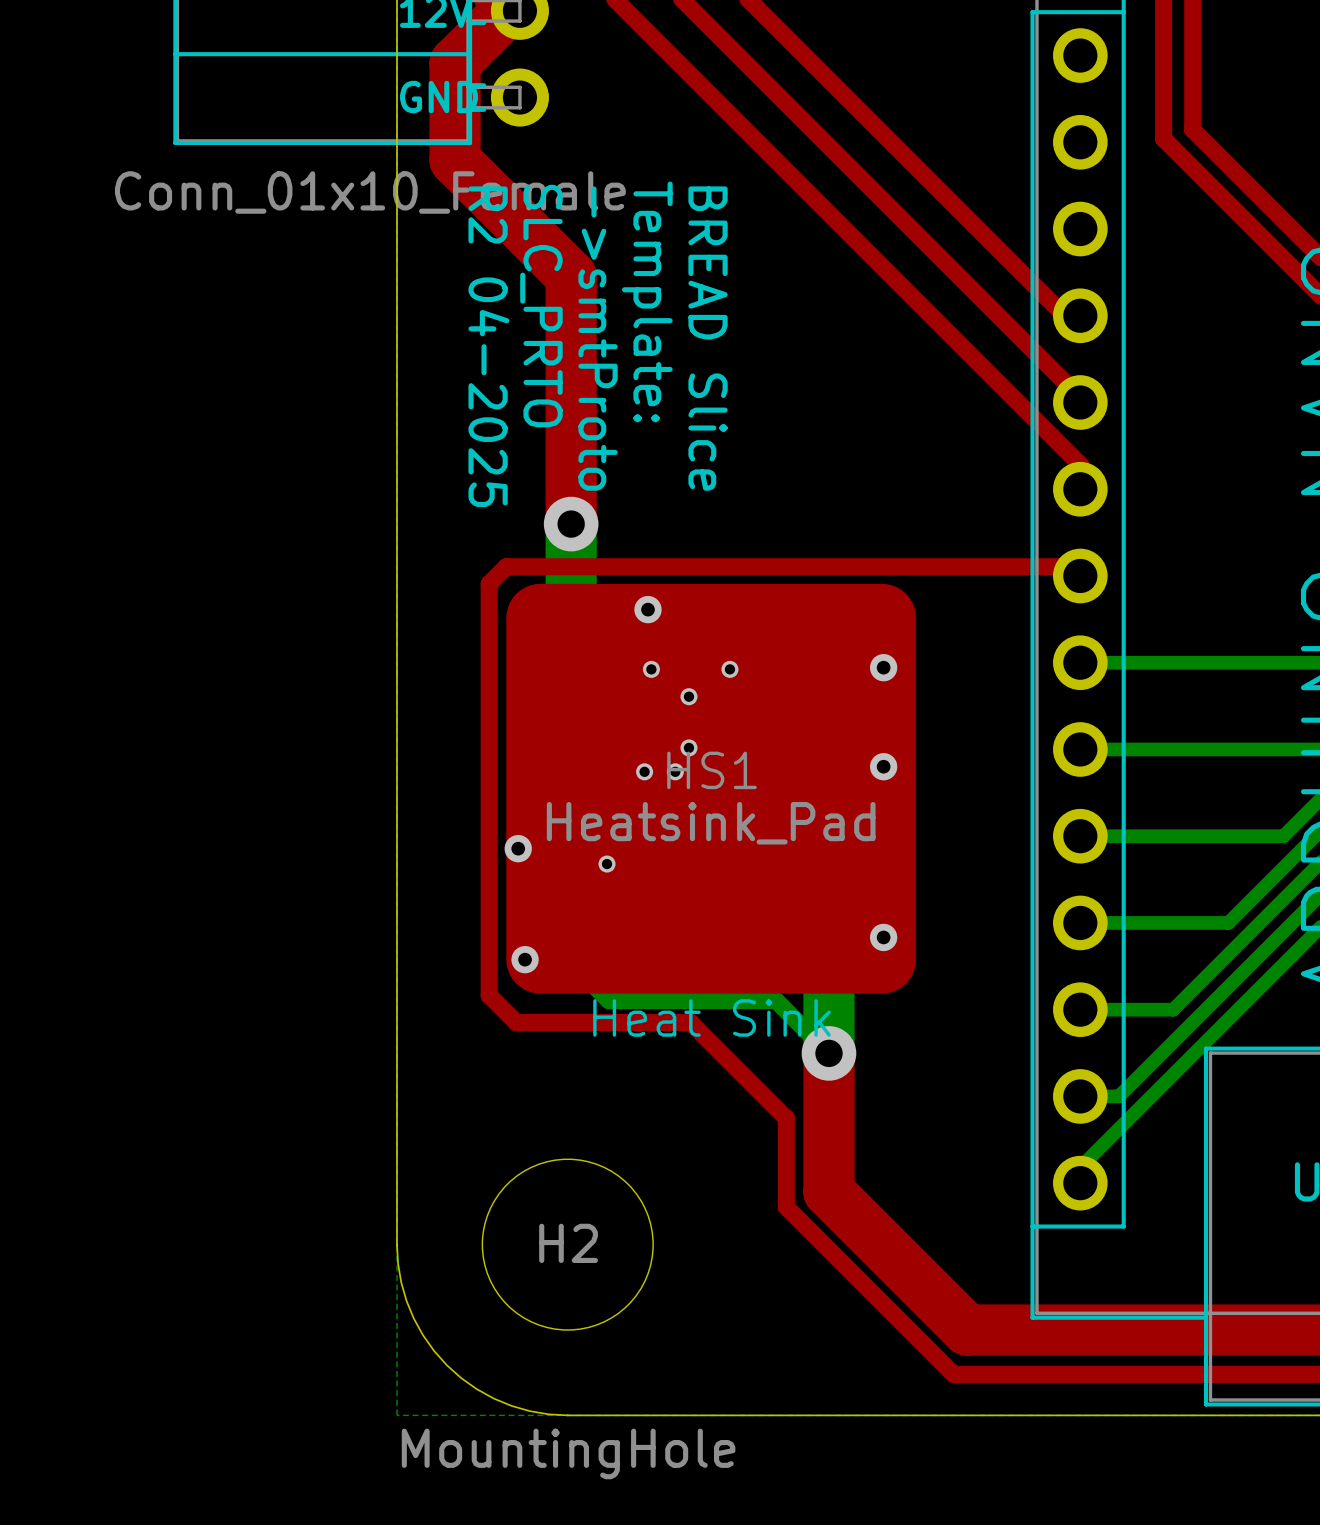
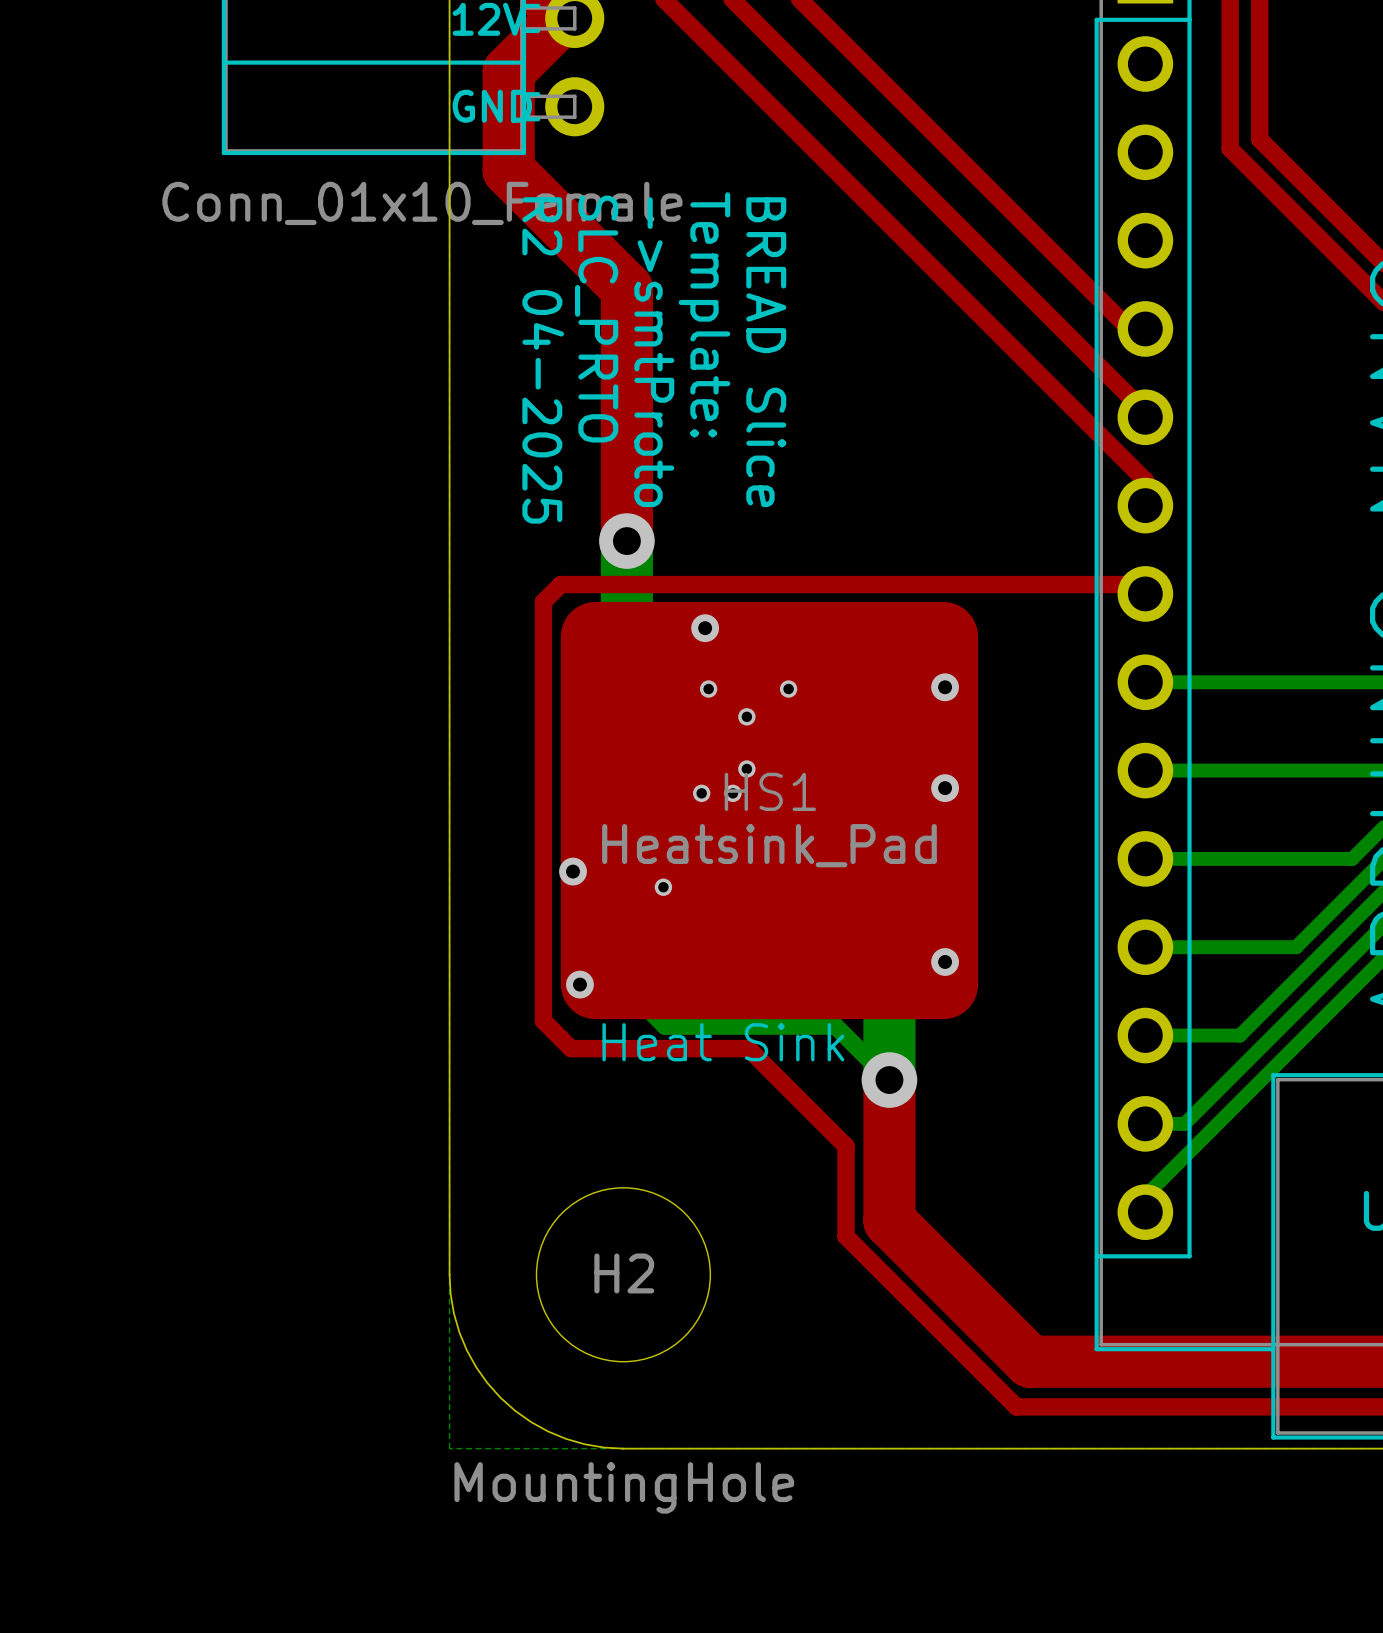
HS1 text position: Heat Sink (711, 1017) -> Heat Sink (723, 1042)

